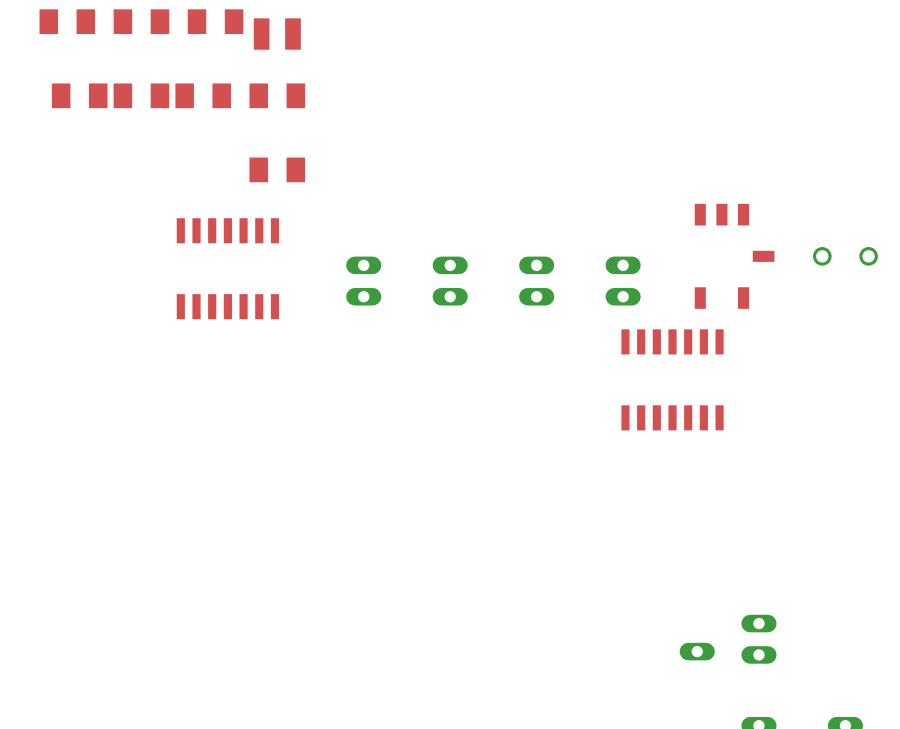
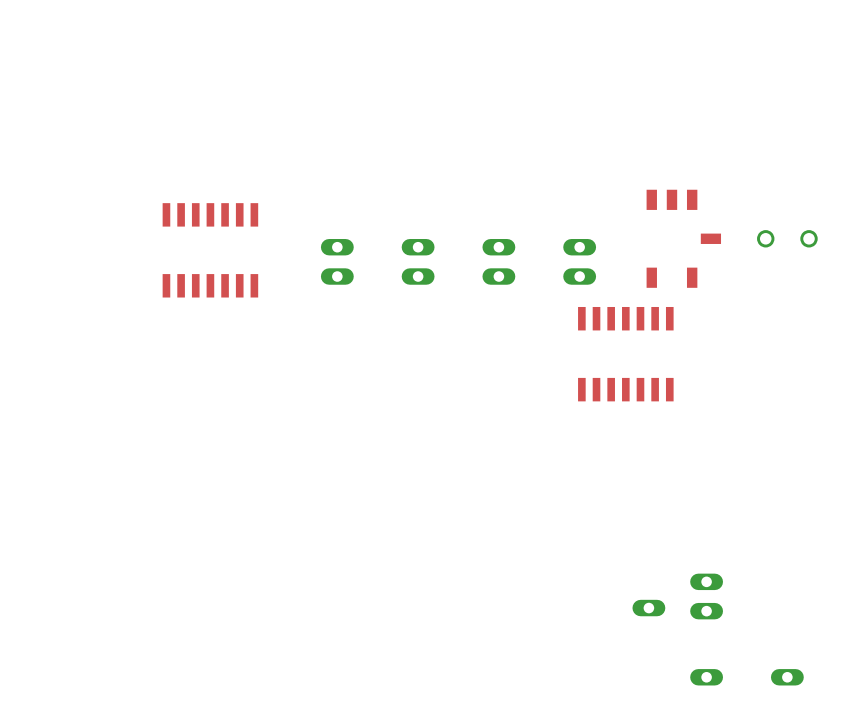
part: (67, 21) -> none
part: (141, 21) -> none
part: (215, 21) -> none
part: (277, 34) -> none
part: (79, 95) -> none
part: (141, 95) -> none
part: (203, 95) -> none
part: (277, 95) -> none
part: (277, 169) -> none

